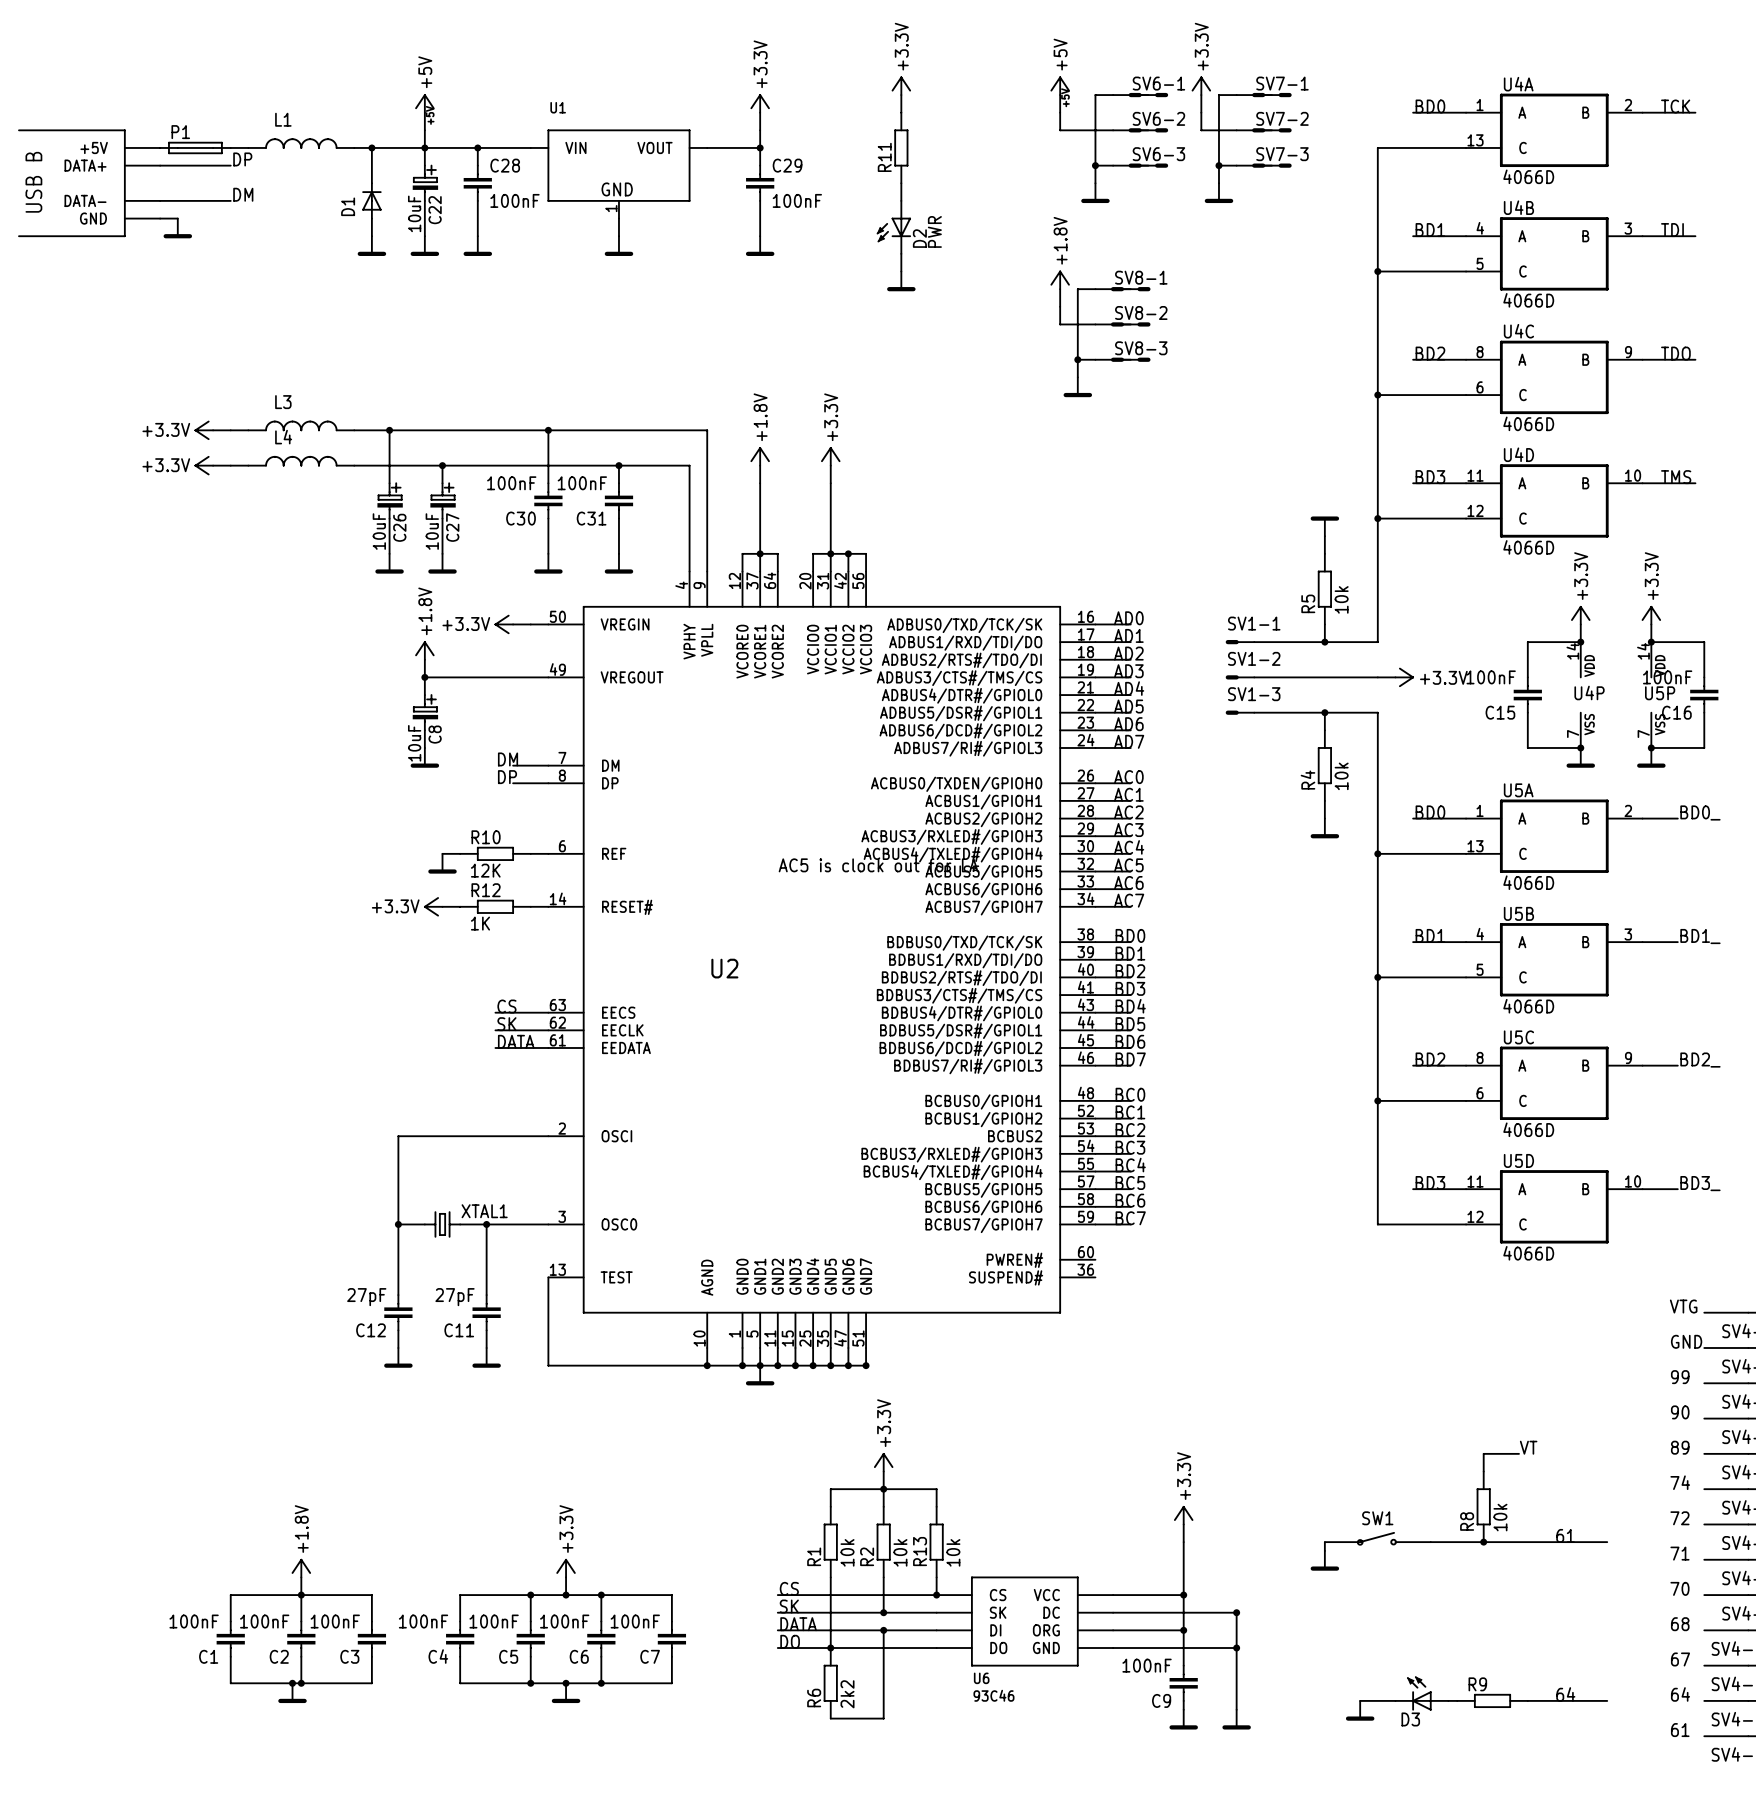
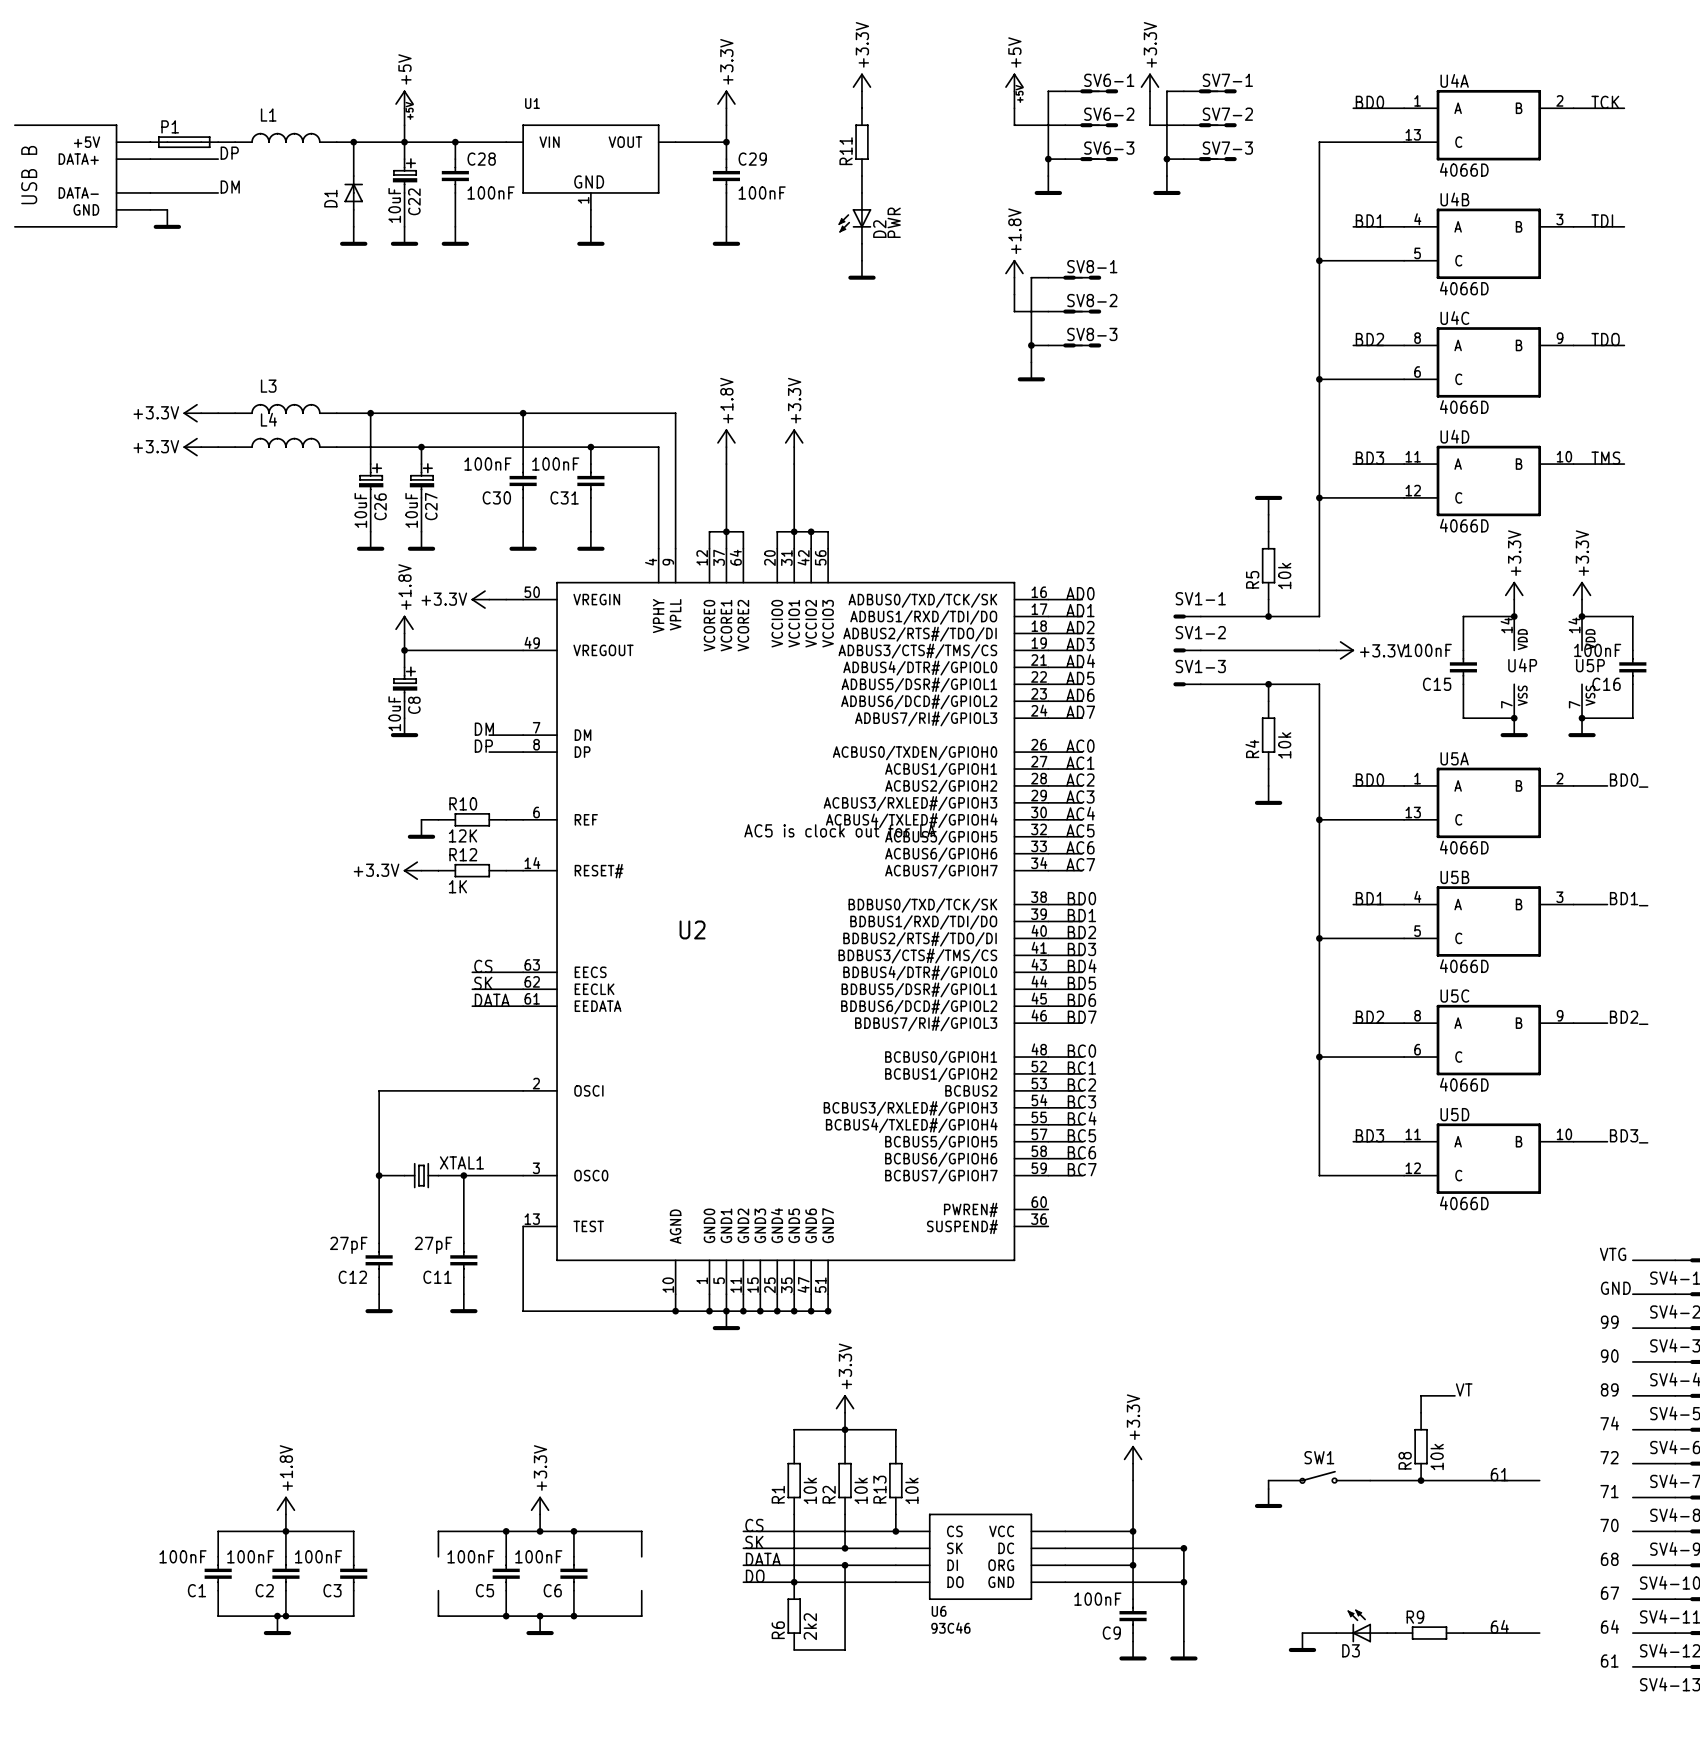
C4: 100nF (460, 1639) -> none
C7: 100nF (671, 1639) -> none

